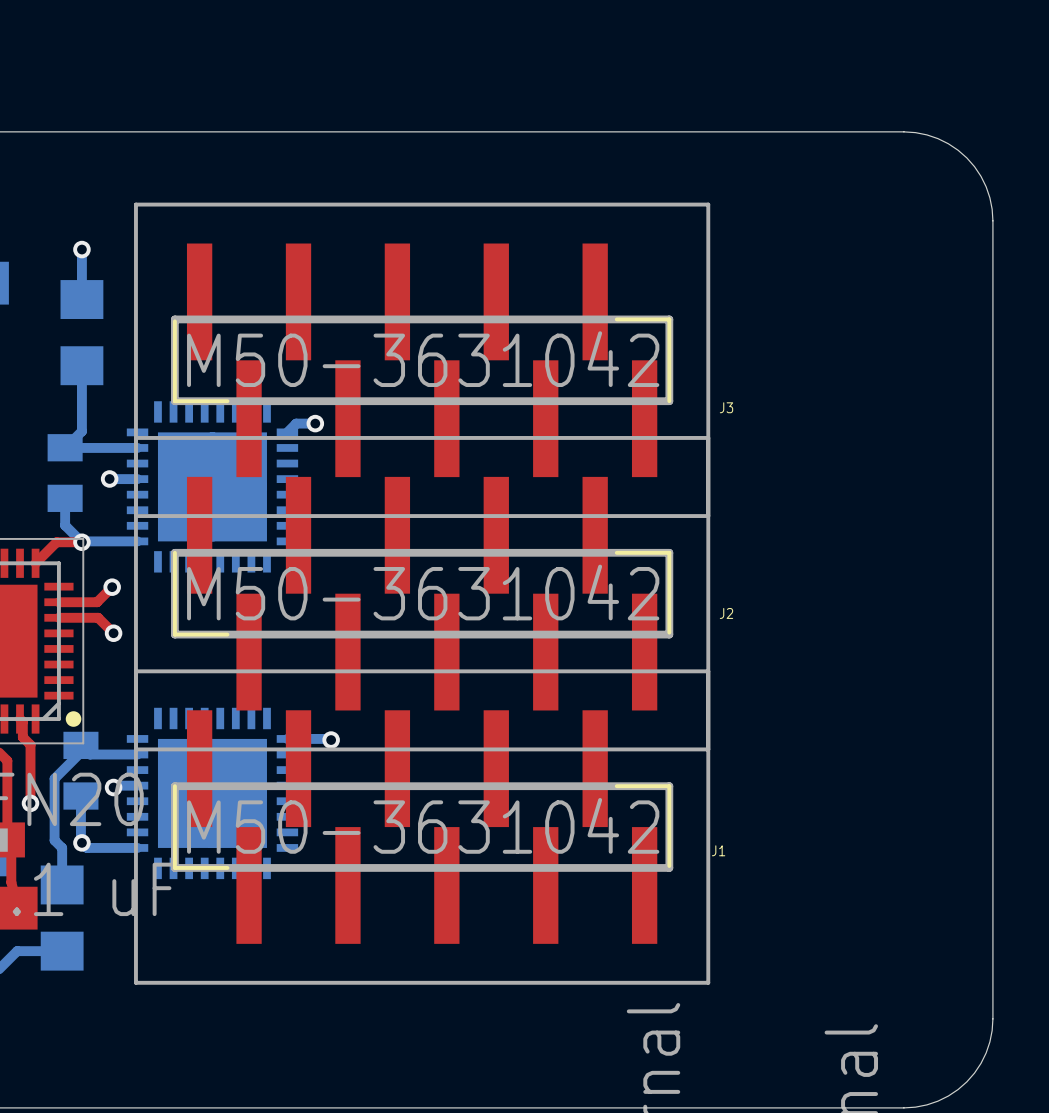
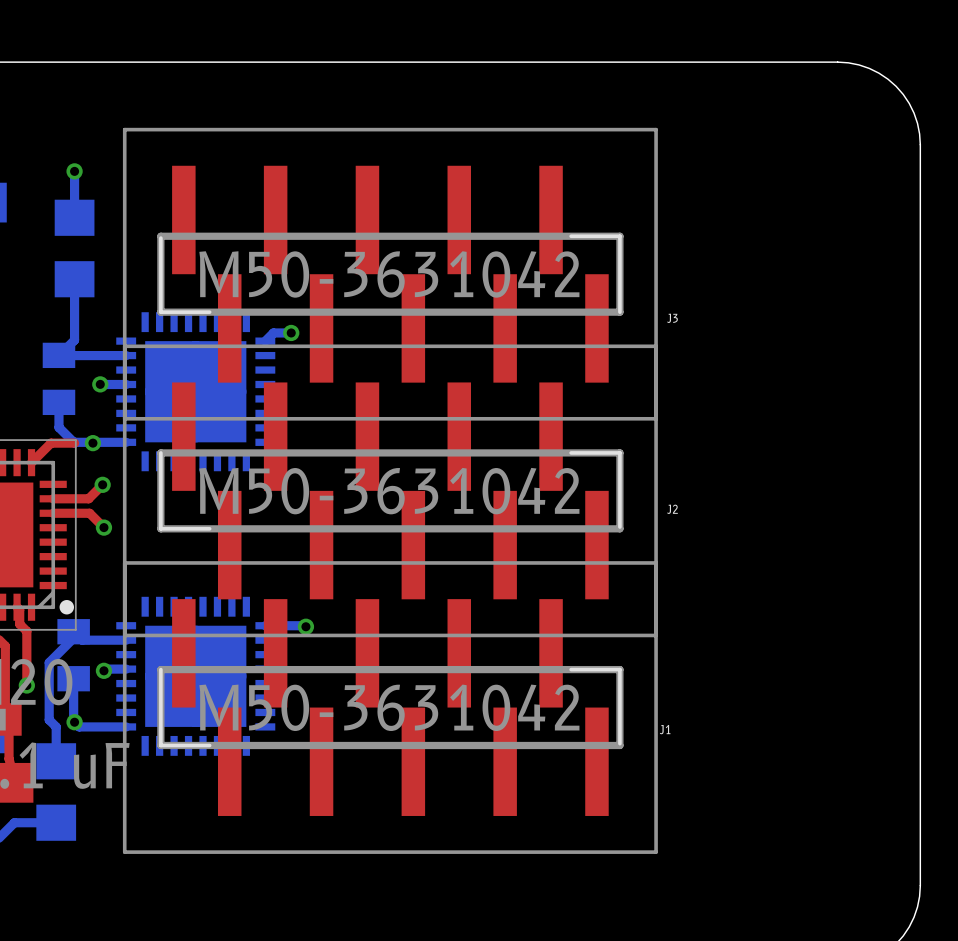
via position: (81, 542) -> (92, 443)

